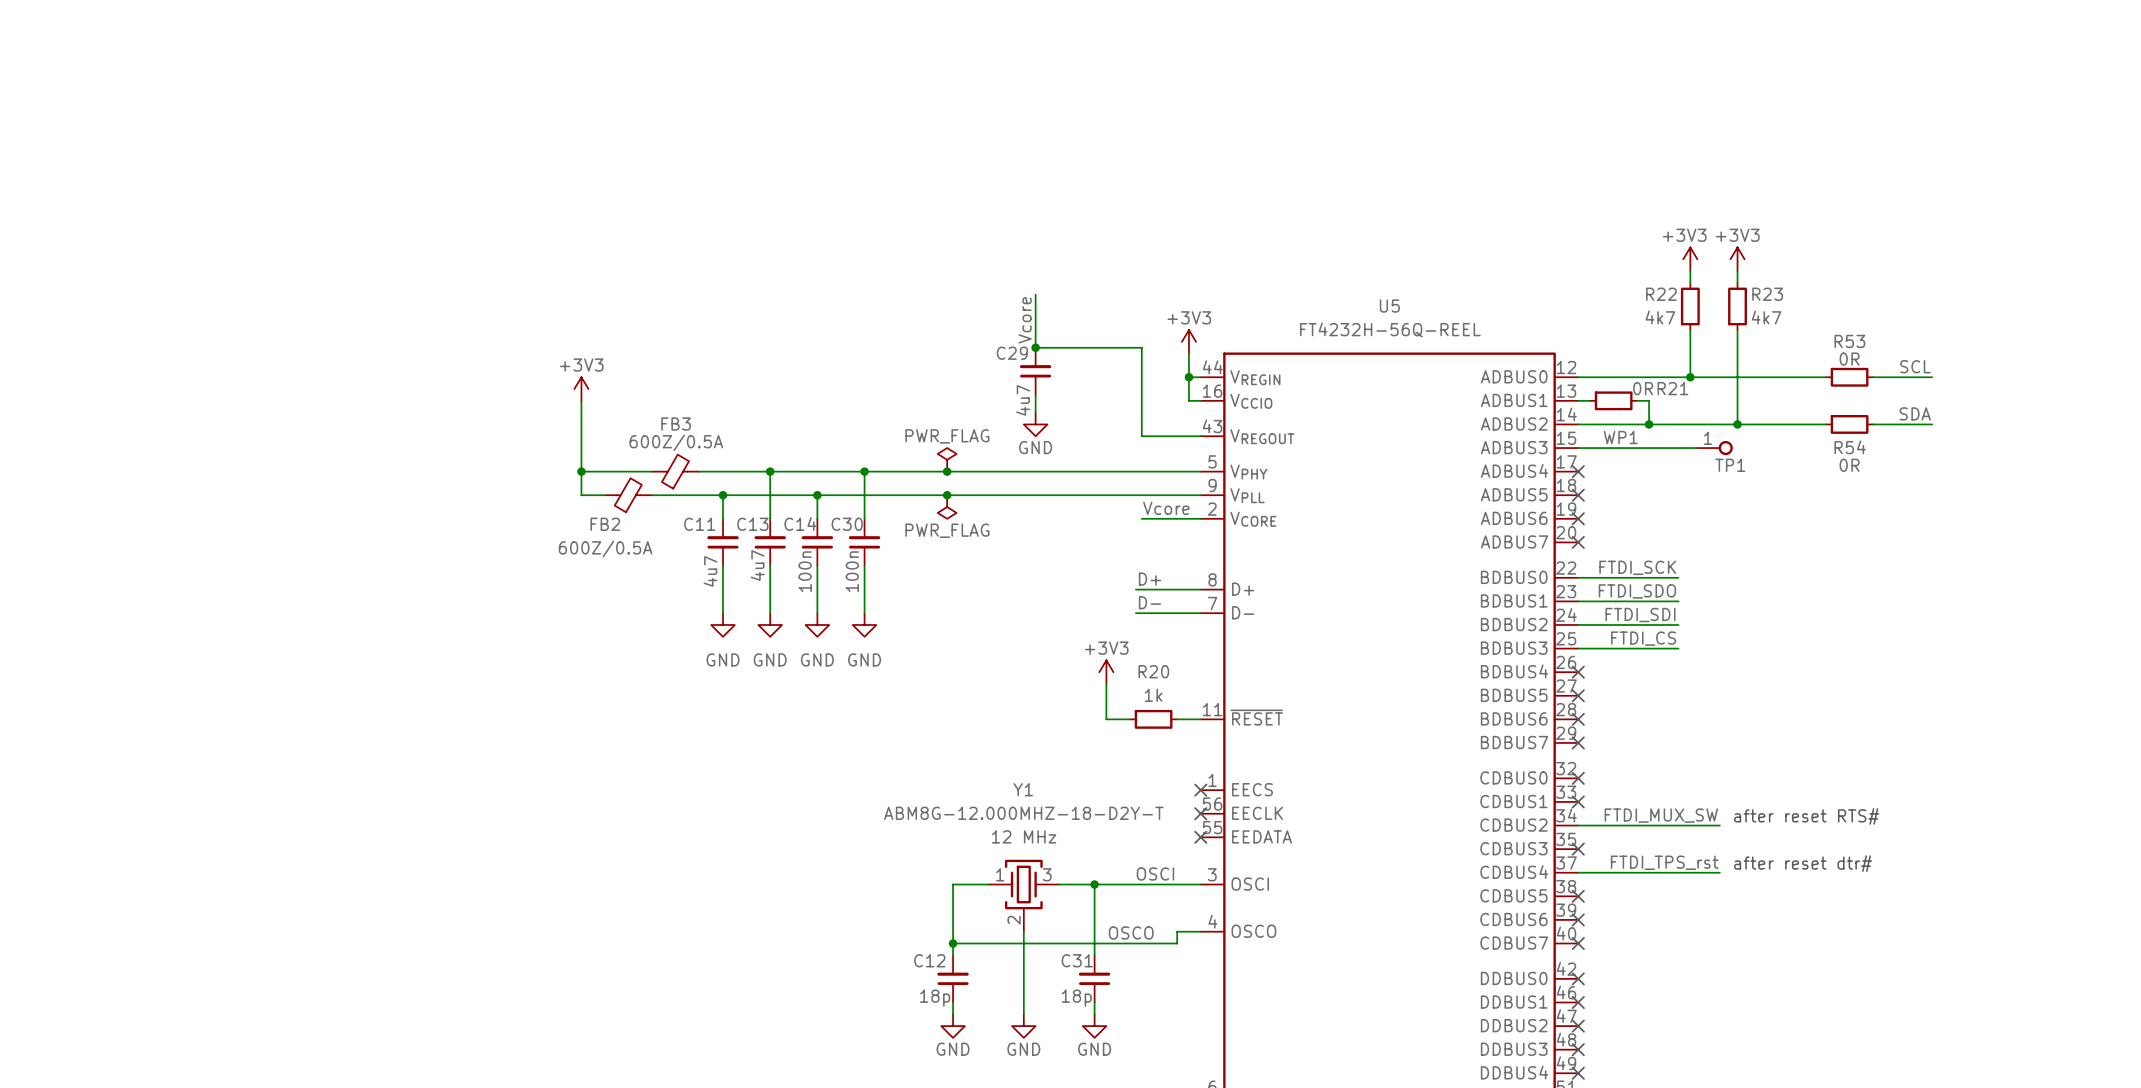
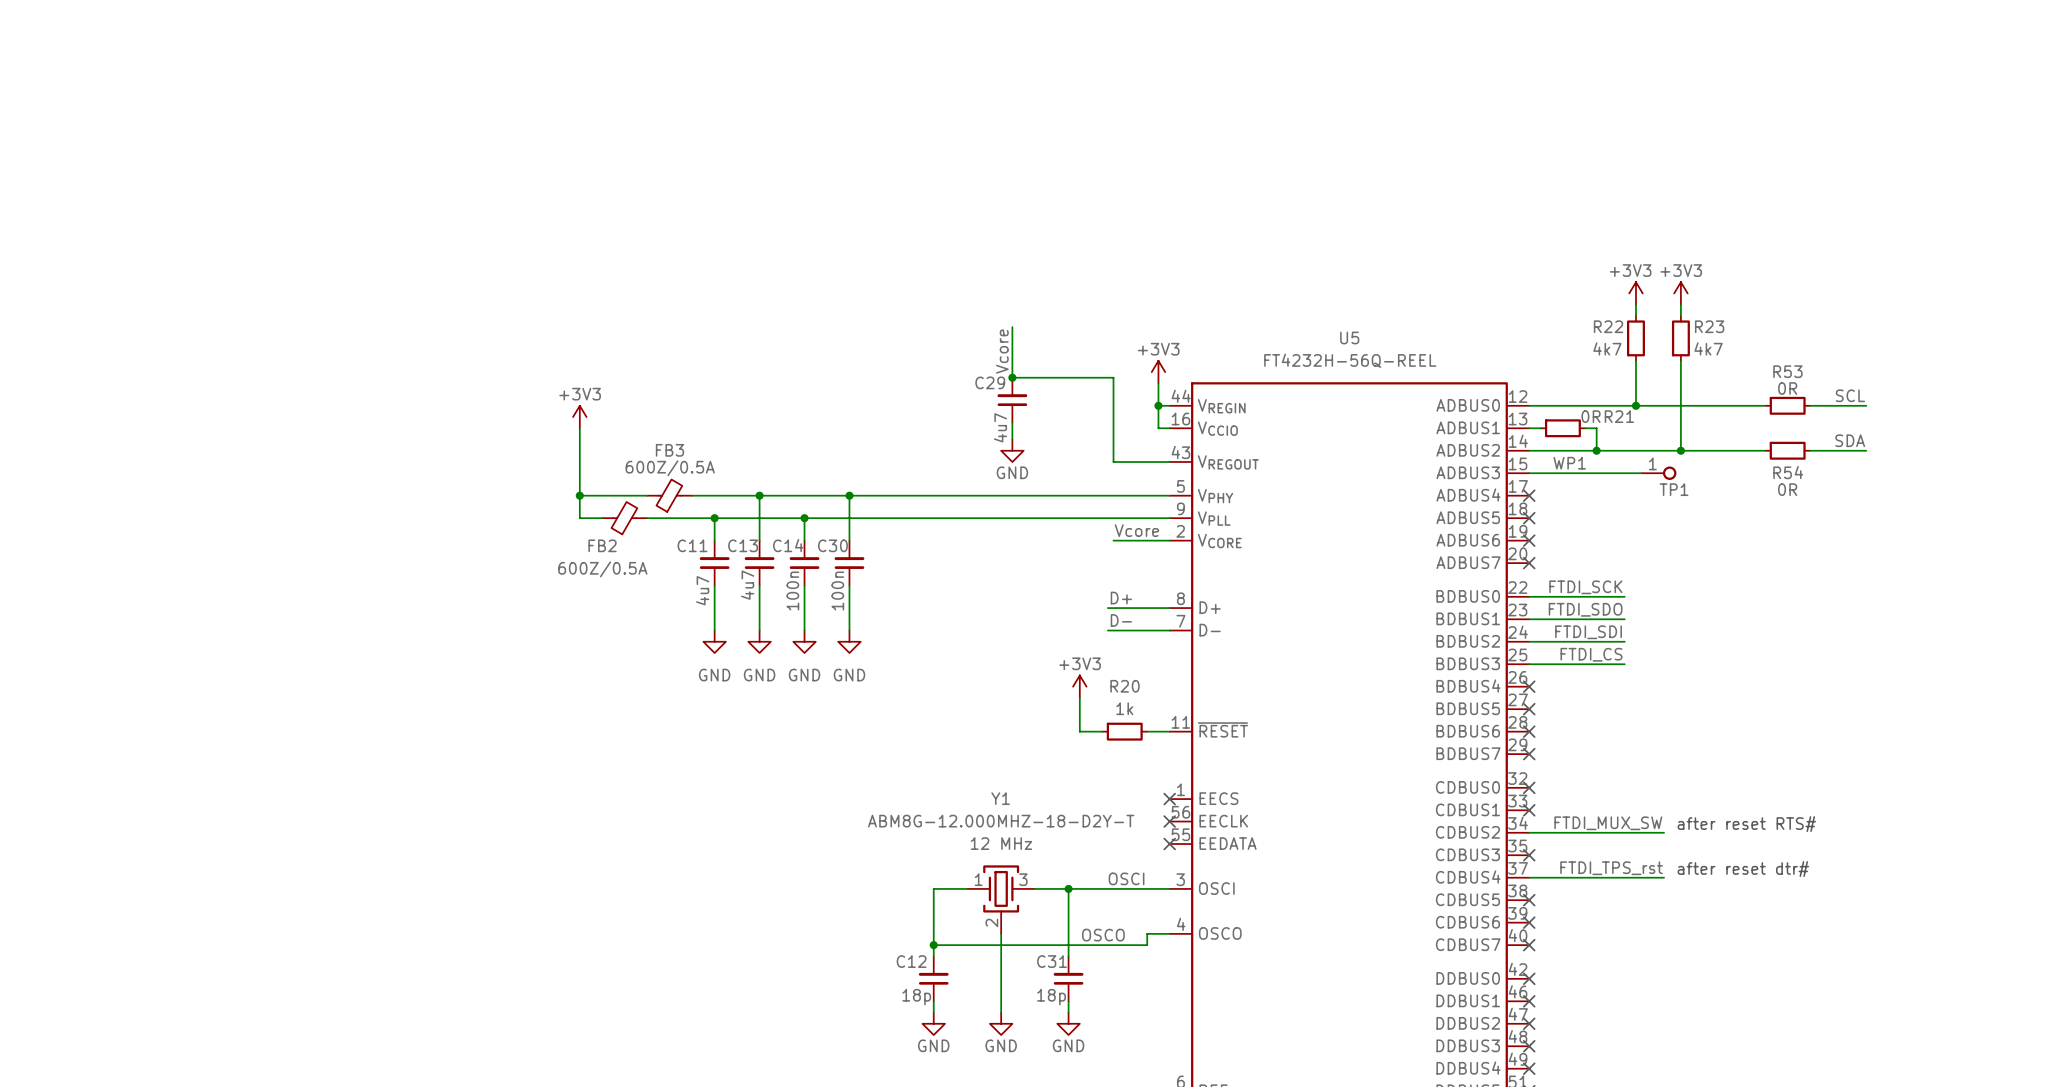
power symbol: PWR_FLAG (947, 459) -> none
junction: (947, 471) -> none
junction: (947, 495) -> none
power symbol: PWR_FLAG (947, 507) -> none

